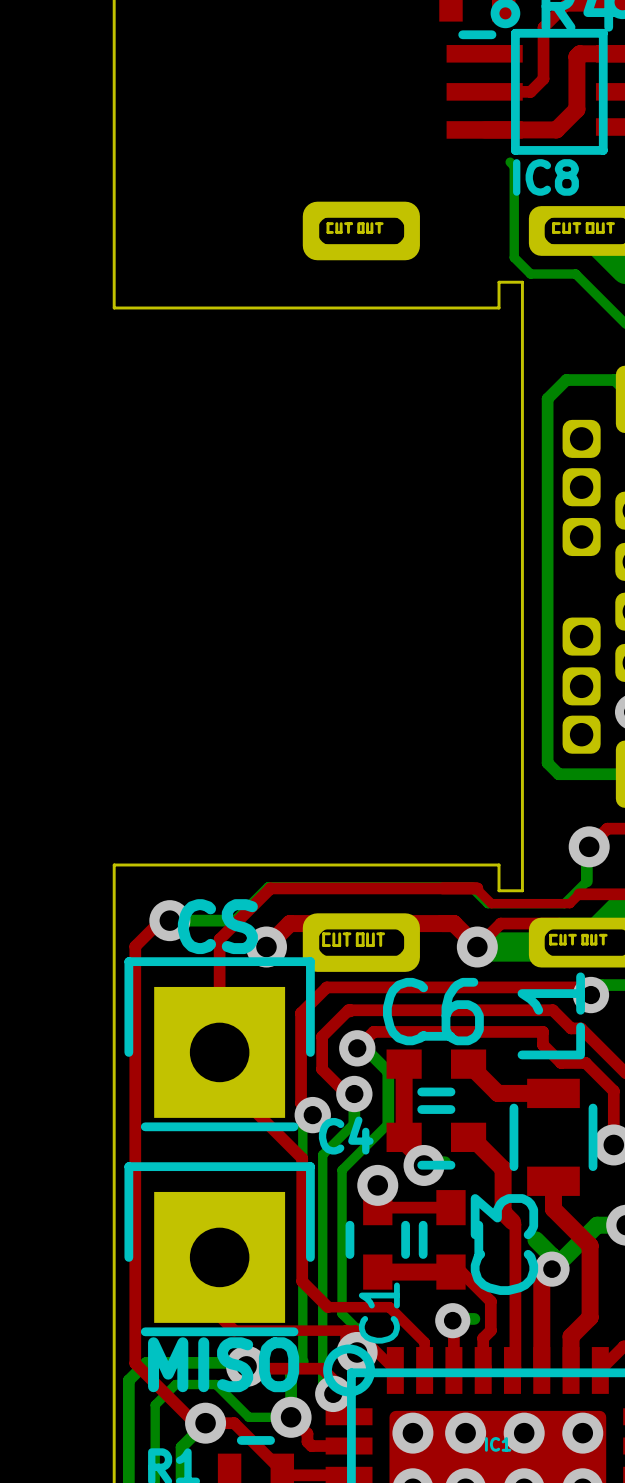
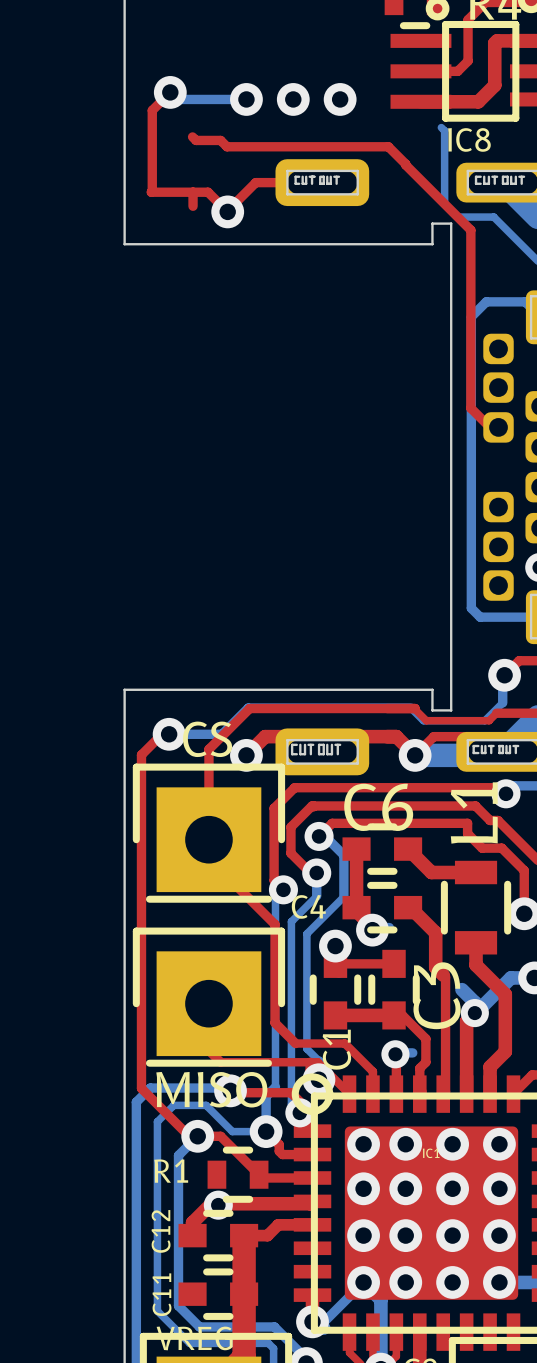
bottom track: none -> (170, 92) (177, 99) (246, 99)
top track: none -> (170, 92) (152, 110) (151, 192) (208, 192) (227, 211) (255, 182) (322, 182)
via: none -> (170, 92)
via: none -> (246, 99)
via: none -> (293, 99)
via: none -> (340, 99)
top track: none -> (192, 136) (196, 140) (220, 140) (227, 146) (388, 146) (405, 164)
top track: none -> (405, 165) (470, 230) (470, 408) (490, 427)
top track: none -> (193, 192) (193, 206)
via: none -> (227, 211)

